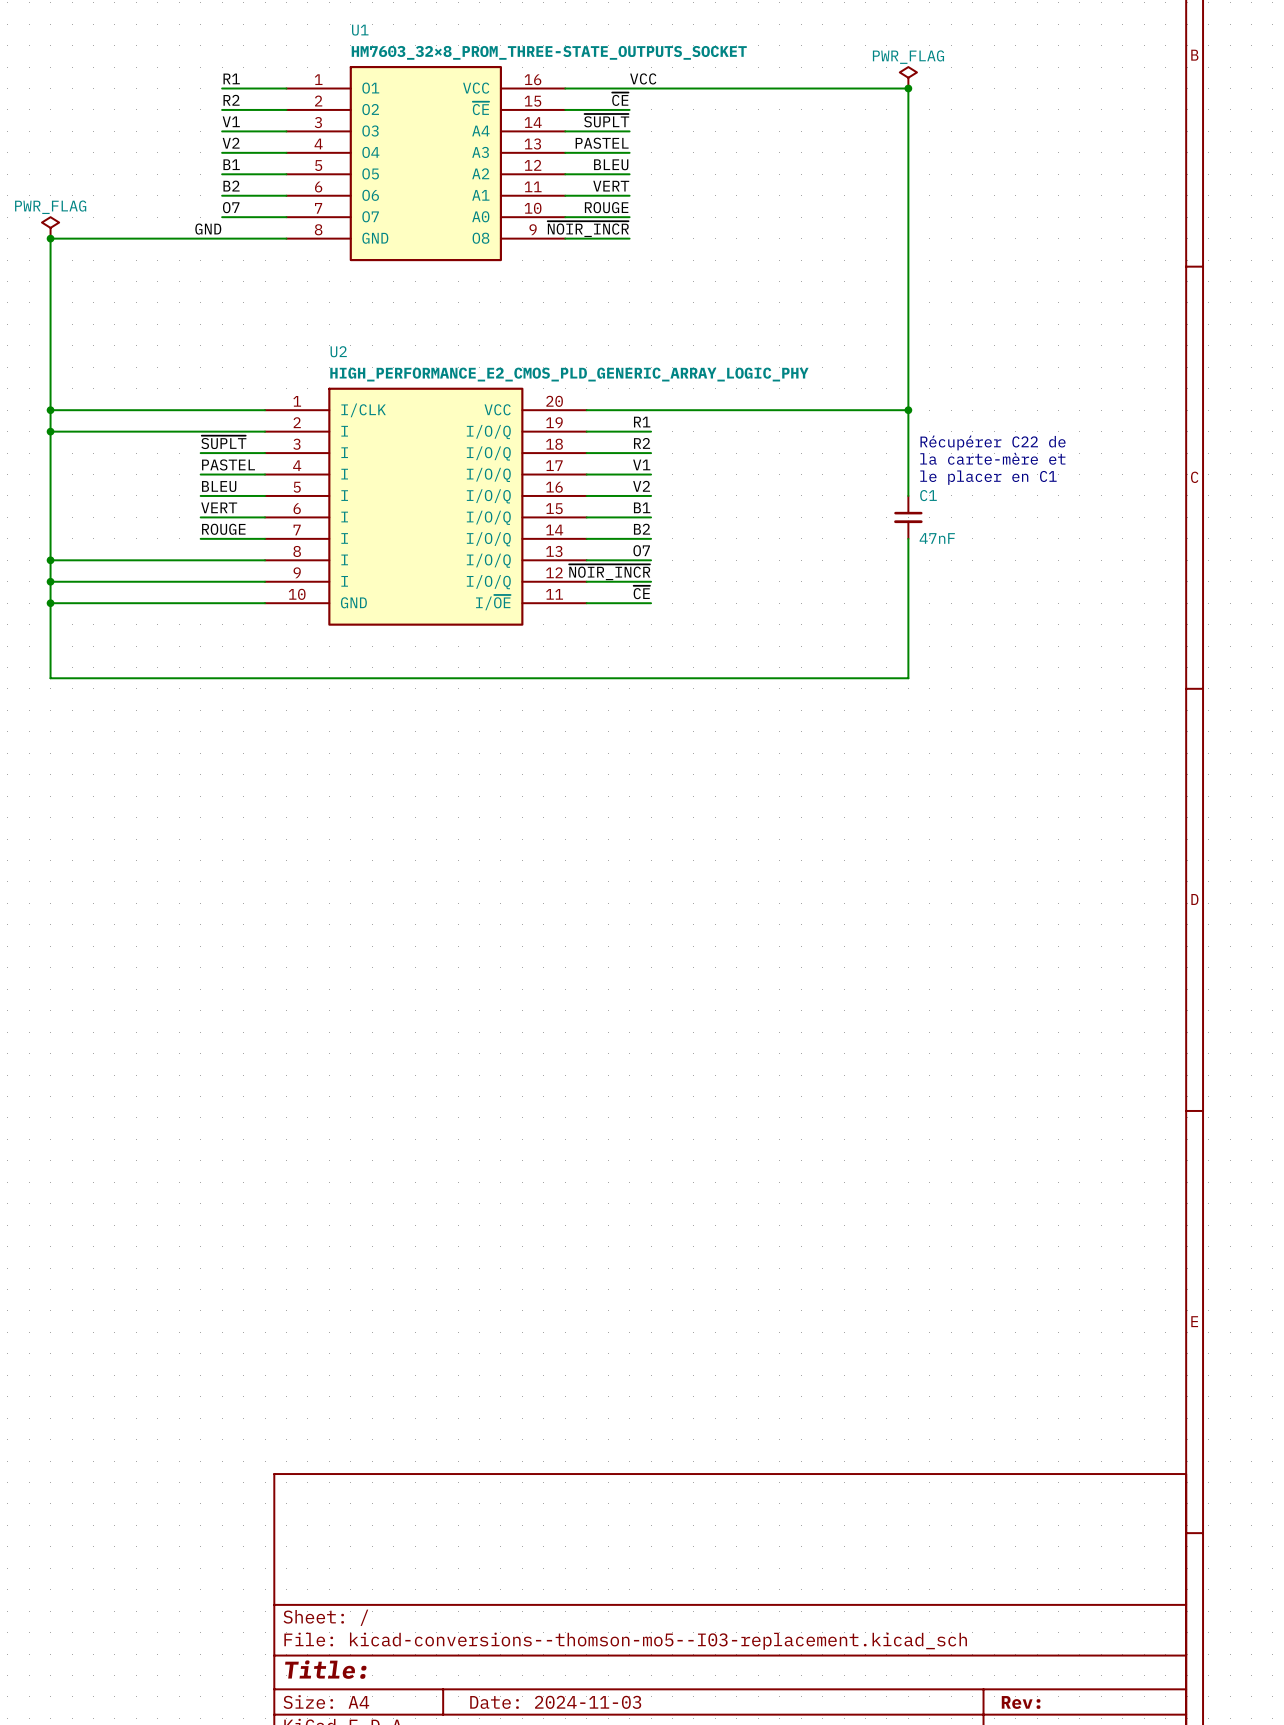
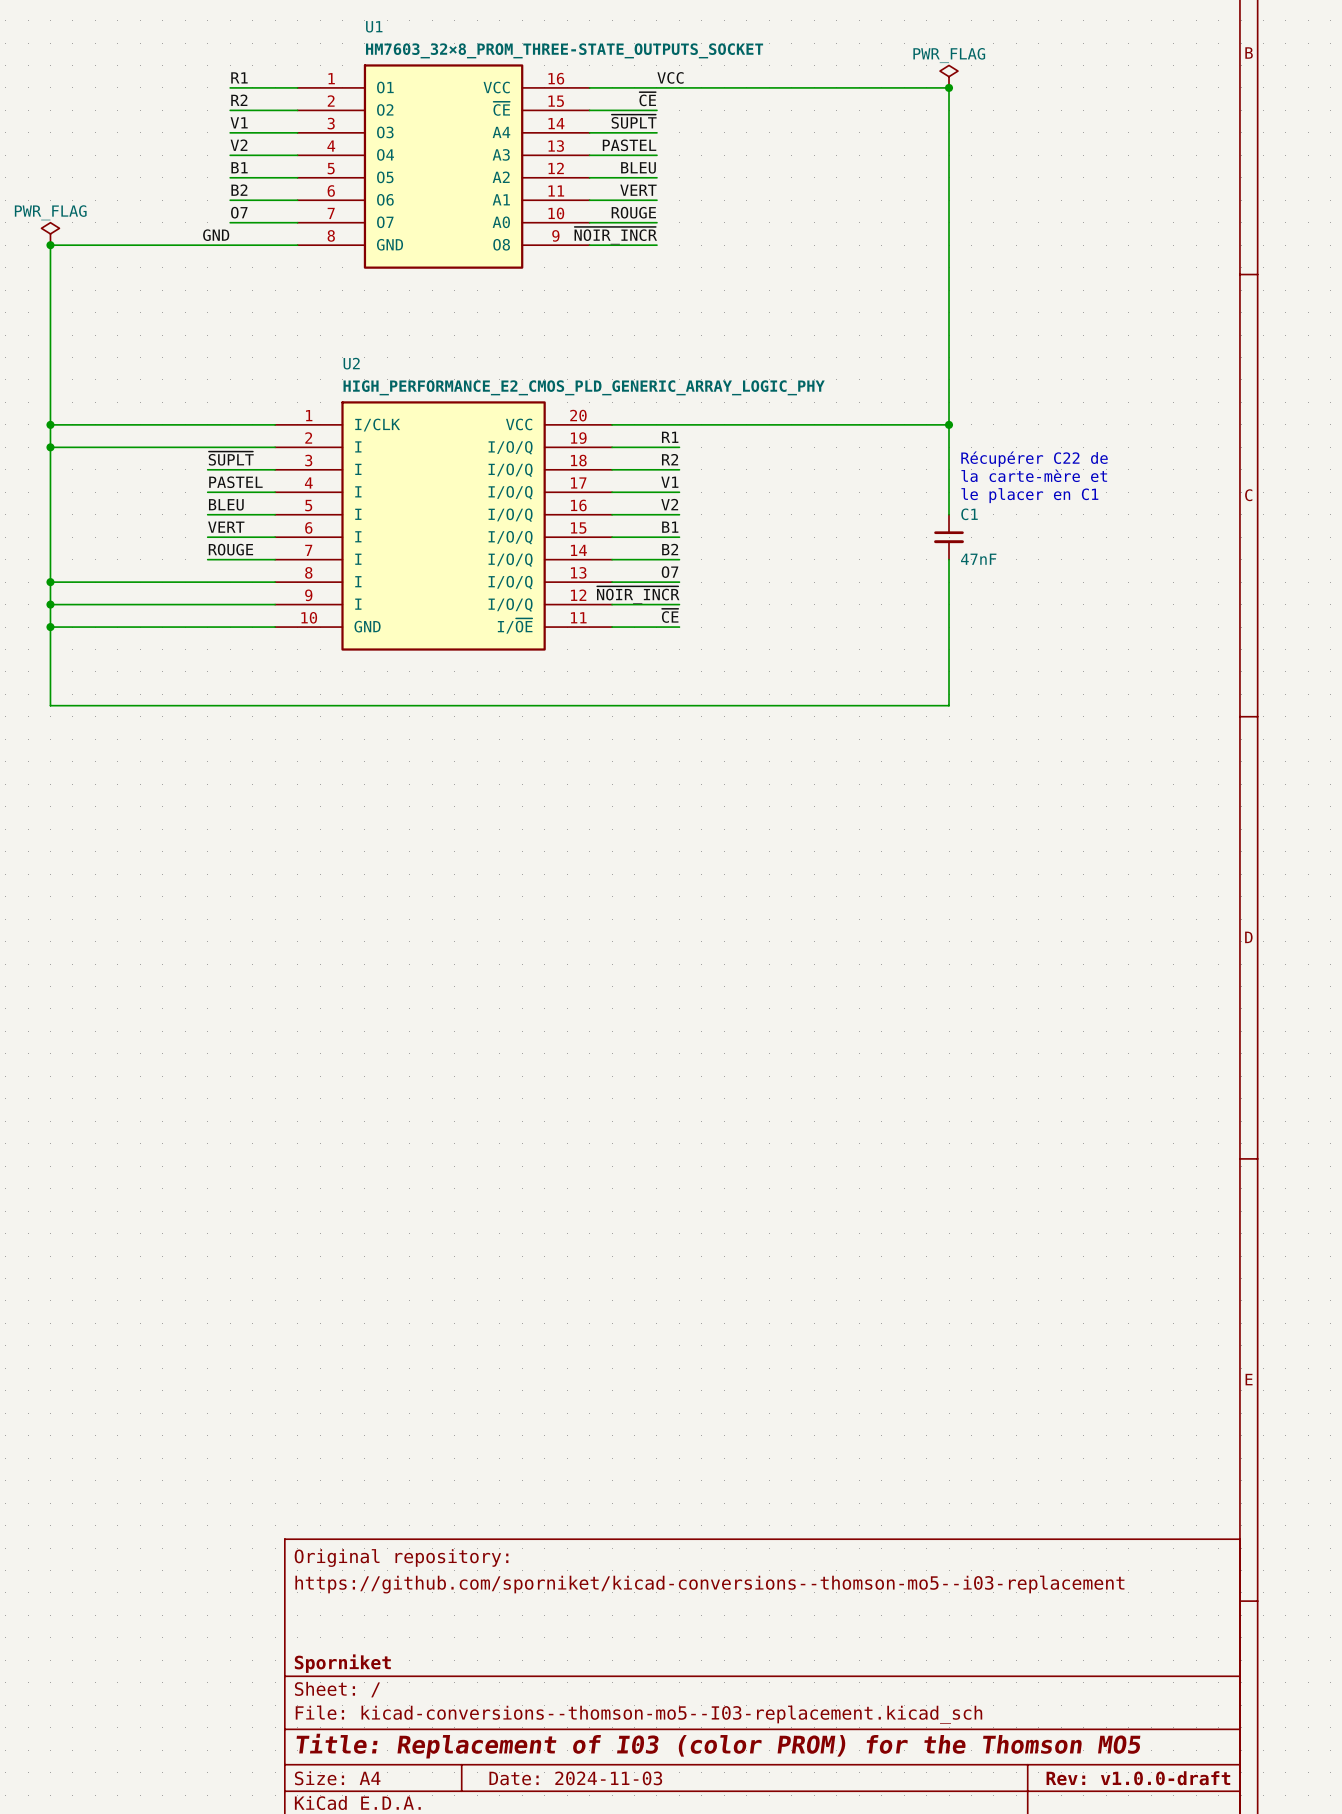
title block: none -> Original repository: (401, 1558)
title block: none -> https://github.com/sporniket/kicad-conversions--thomson-mo5--i03-replacement (709, 1584)
title block: none -> Sporniket (342, 1663)
title block: Title: (325, 1669) -> Title: Replacement of I03 (color PROM) for the Thomson MO5 (718, 1746)
title block: Rev: (1021, 1702) -> Rev: v1.0.0-draft (1138, 1778)

